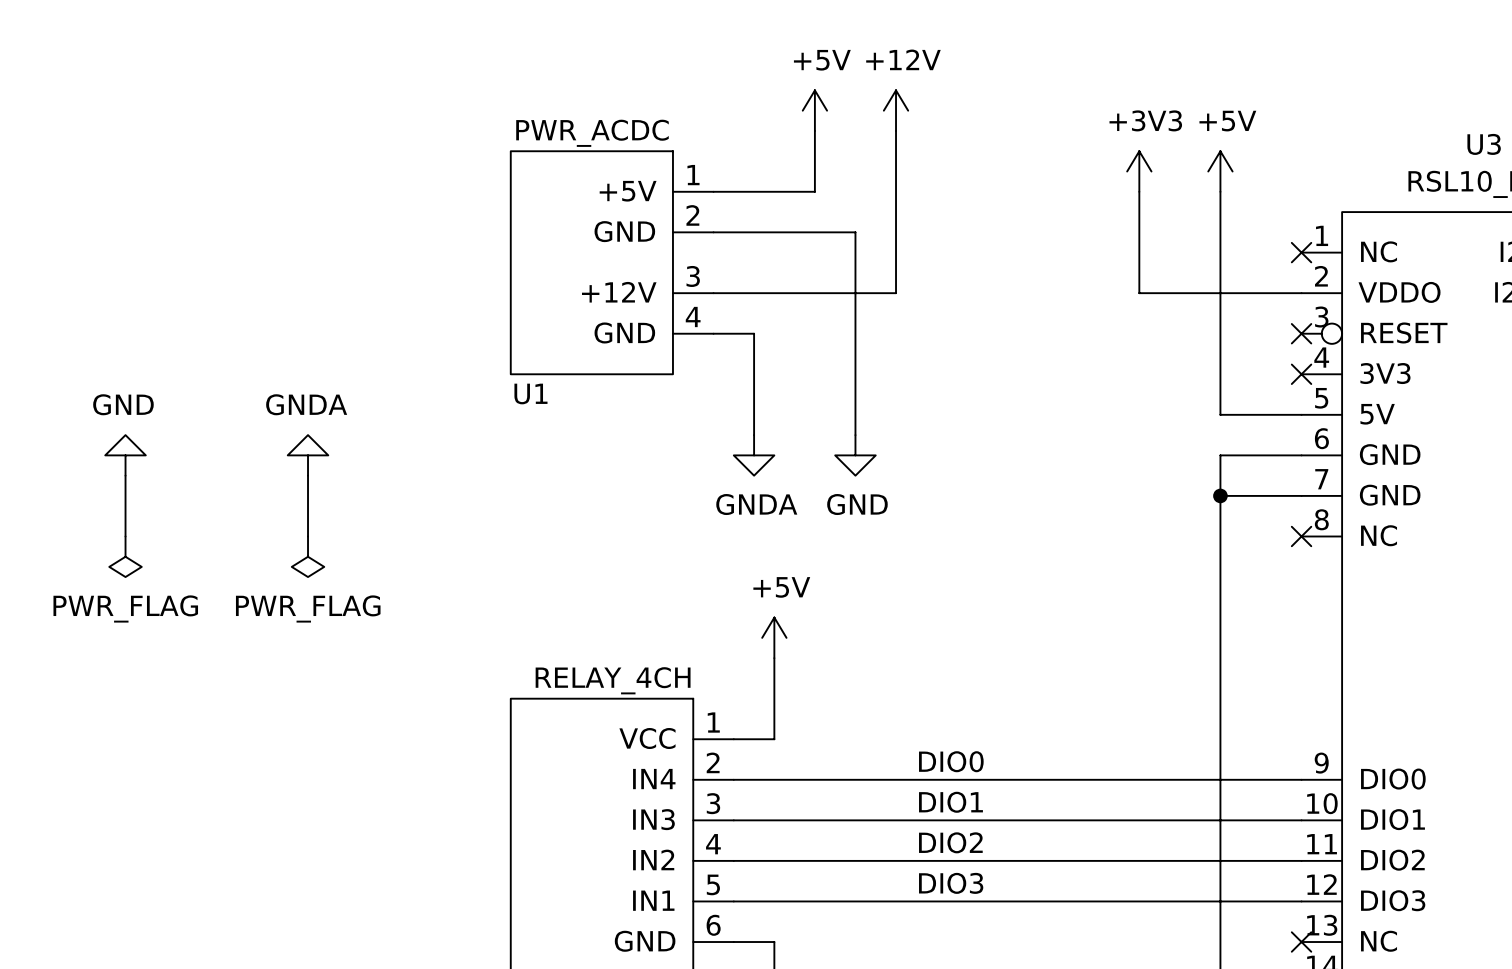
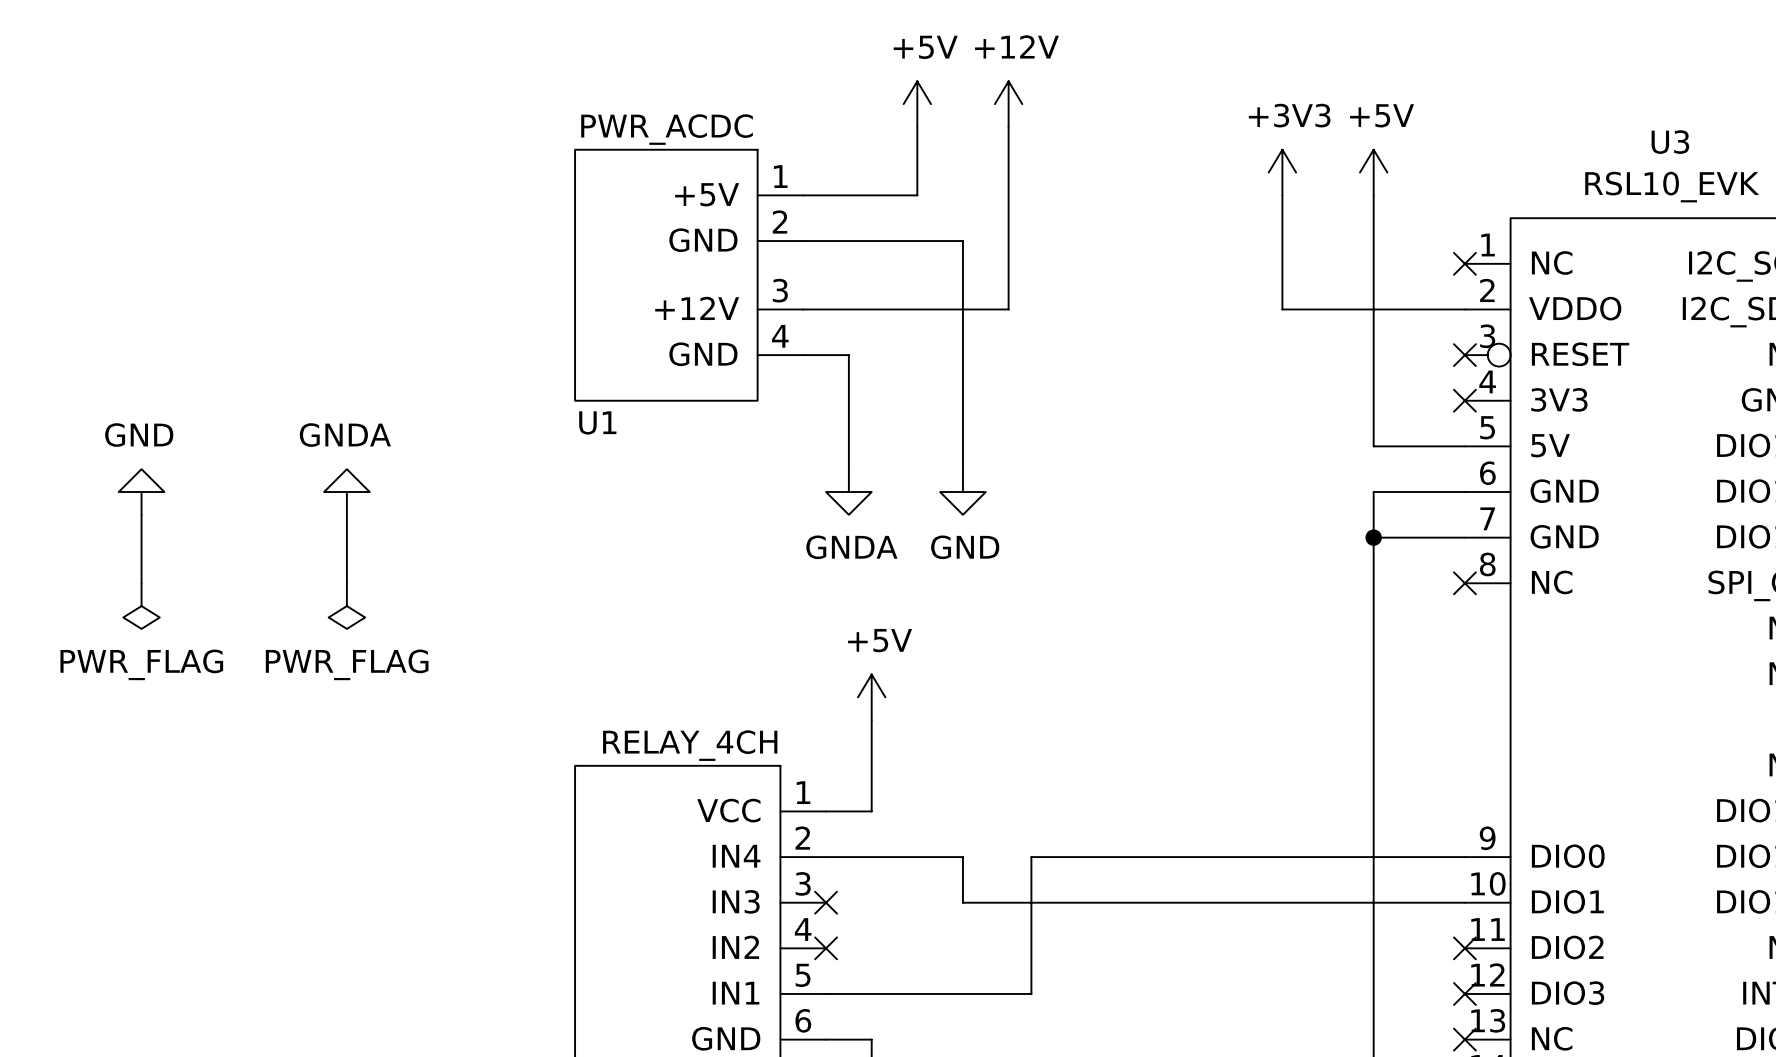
label: DIO0 (951, 761) -> none
wire: (855, 779) (916, 779) -> (962, 857) (962, 902)
label: DIO1 (950, 802) -> none
wire: (733, 820) (855, 820) -> none
no-connect mark: none -> (826, 902)
label: DIO2 (950, 842) -> none
wire: (733, 860) (1301, 860) -> none
no-connect mark: none -> (826, 948)
no-connect mark: none -> (1464, 948)
label: DIO3 (951, 883) -> none
wire: (916, 901) (1301, 901) -> (1031, 993) (1031, 857)
no-connect mark: none -> (1464, 993)

